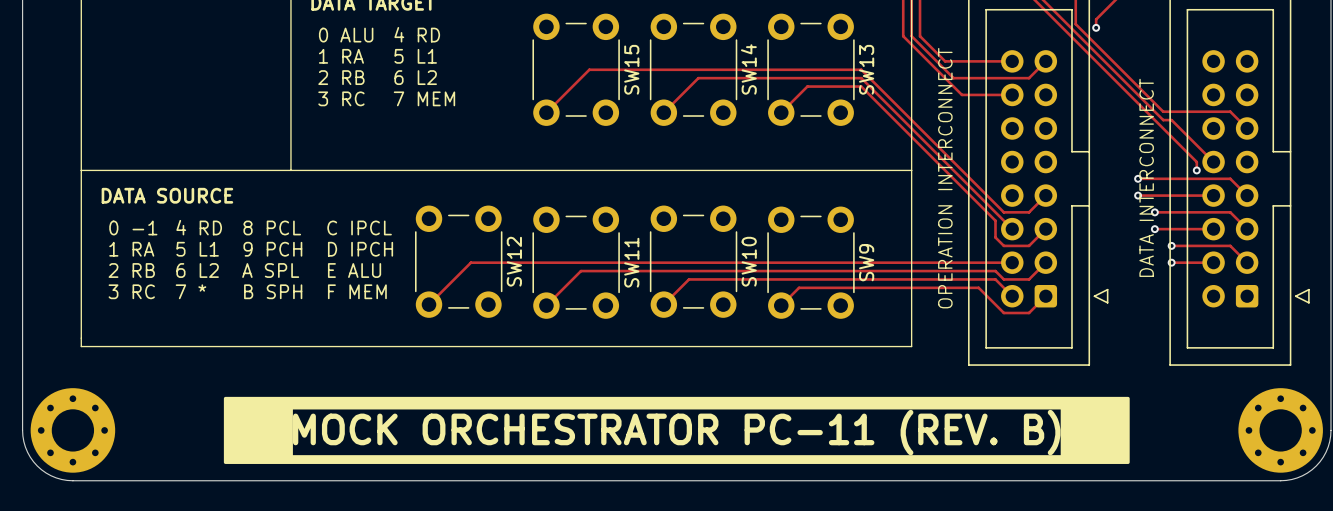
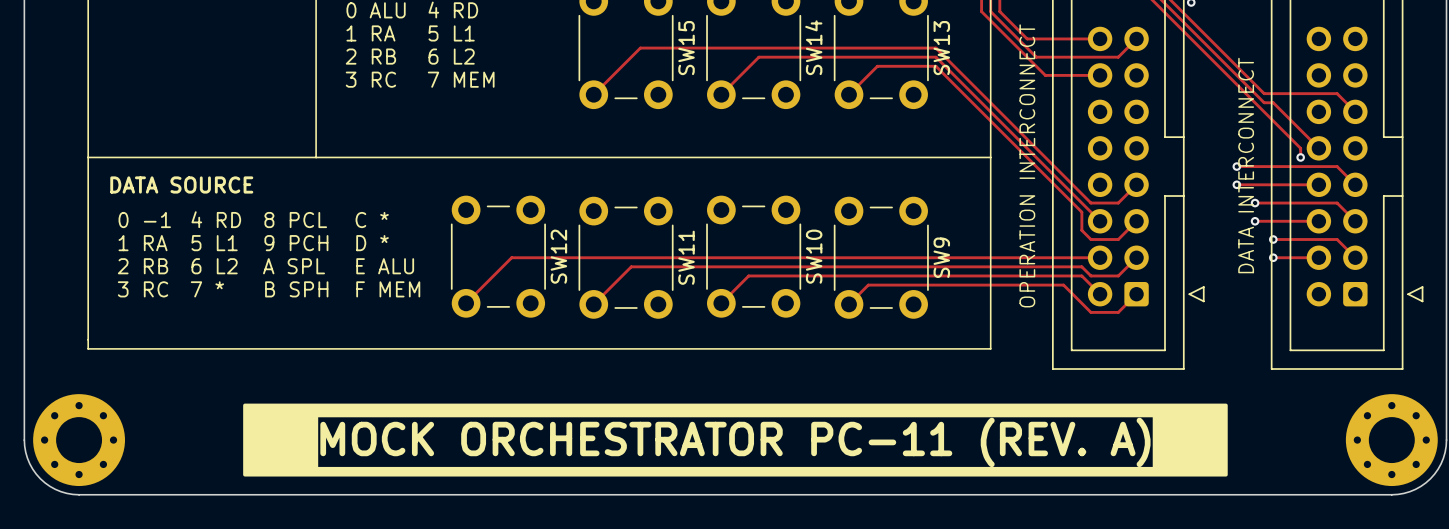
text: C IPCL (359, 227) -> C * (372, 220)
text: D IPCH (360, 249) -> D * (372, 243)
text: MOCK ORCHESTRATOR PC-11 (REV. B) (676, 432) -> MOCK ORCHESTRATOR PC-11 (REV. A) (735, 442)

